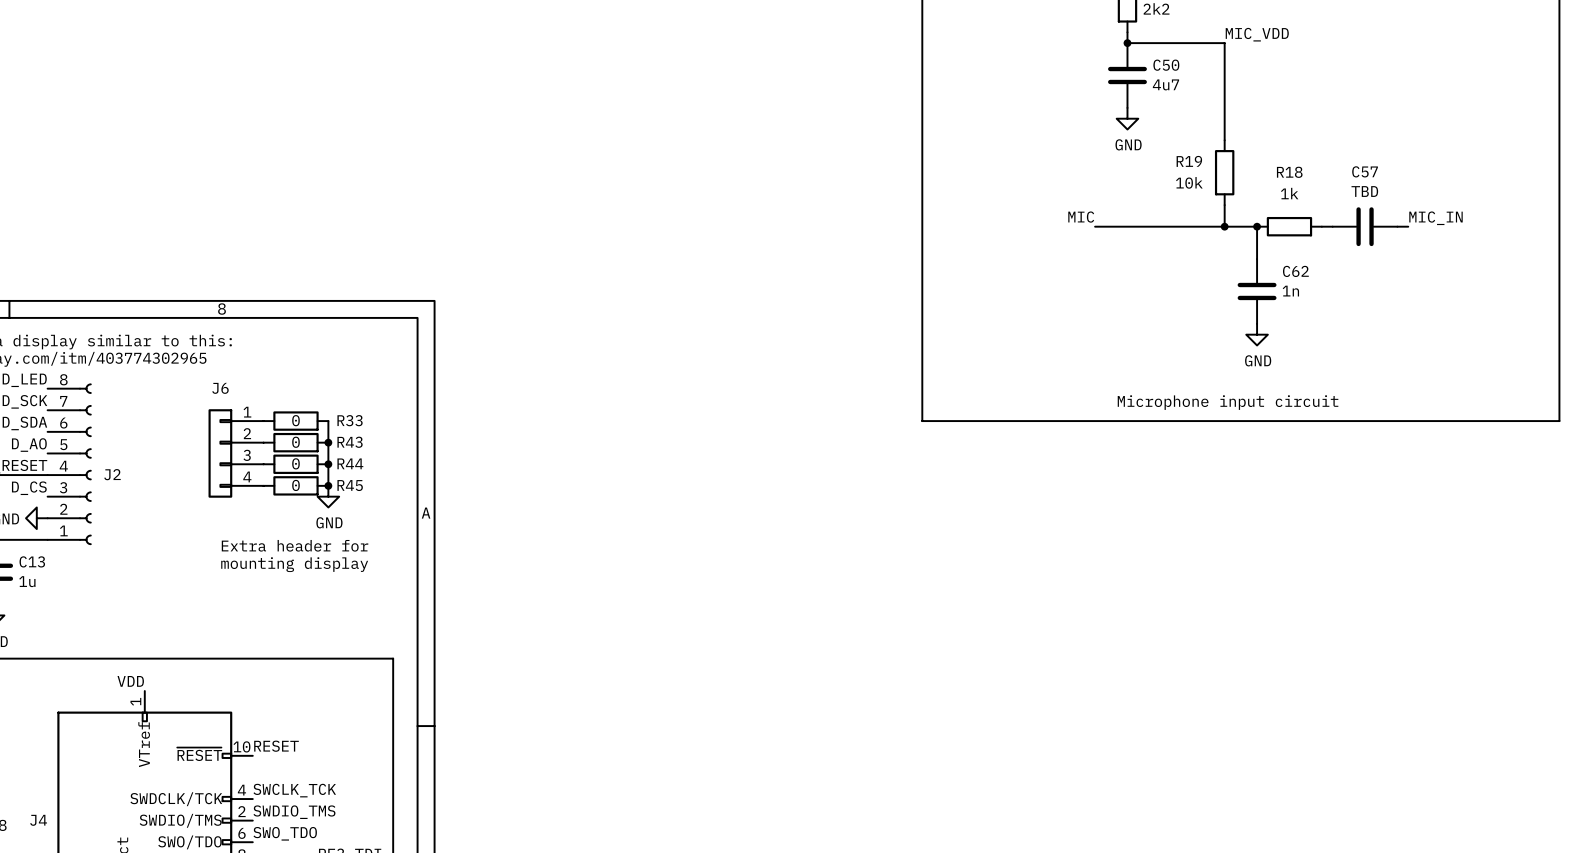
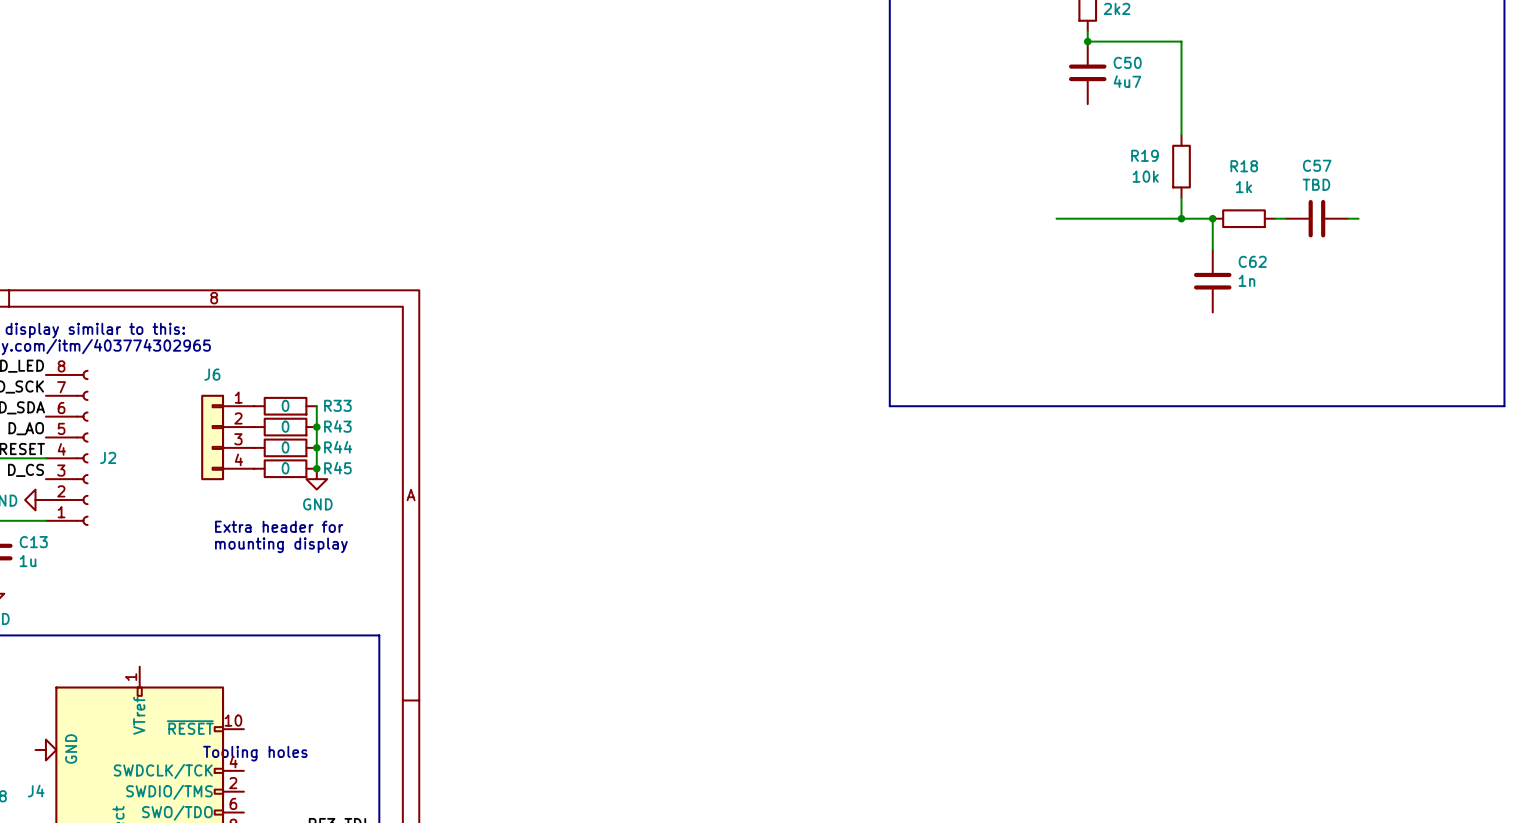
label: MIC_VDD (1257, 34) -> none
power symbol: GND (1127, 118) -> none
label: MIC (1081, 217) -> none
label: MIC_IN (1436, 218) -> none
power symbol: GND (1257, 334) -> none
text: Microphone input circuit (1228, 402) -> none
label: VDD (130, 681) -> none
label: RESET (276, 746) -> none
power symbol: none -> GND (45, 750)
text: none -> Tooling holes (255, 753)
label: SWCLK_TCK (294, 790) -> none
label: SWDIO_TMS (294, 812) -> none
label: SWO_TDO (285, 833) -> none

